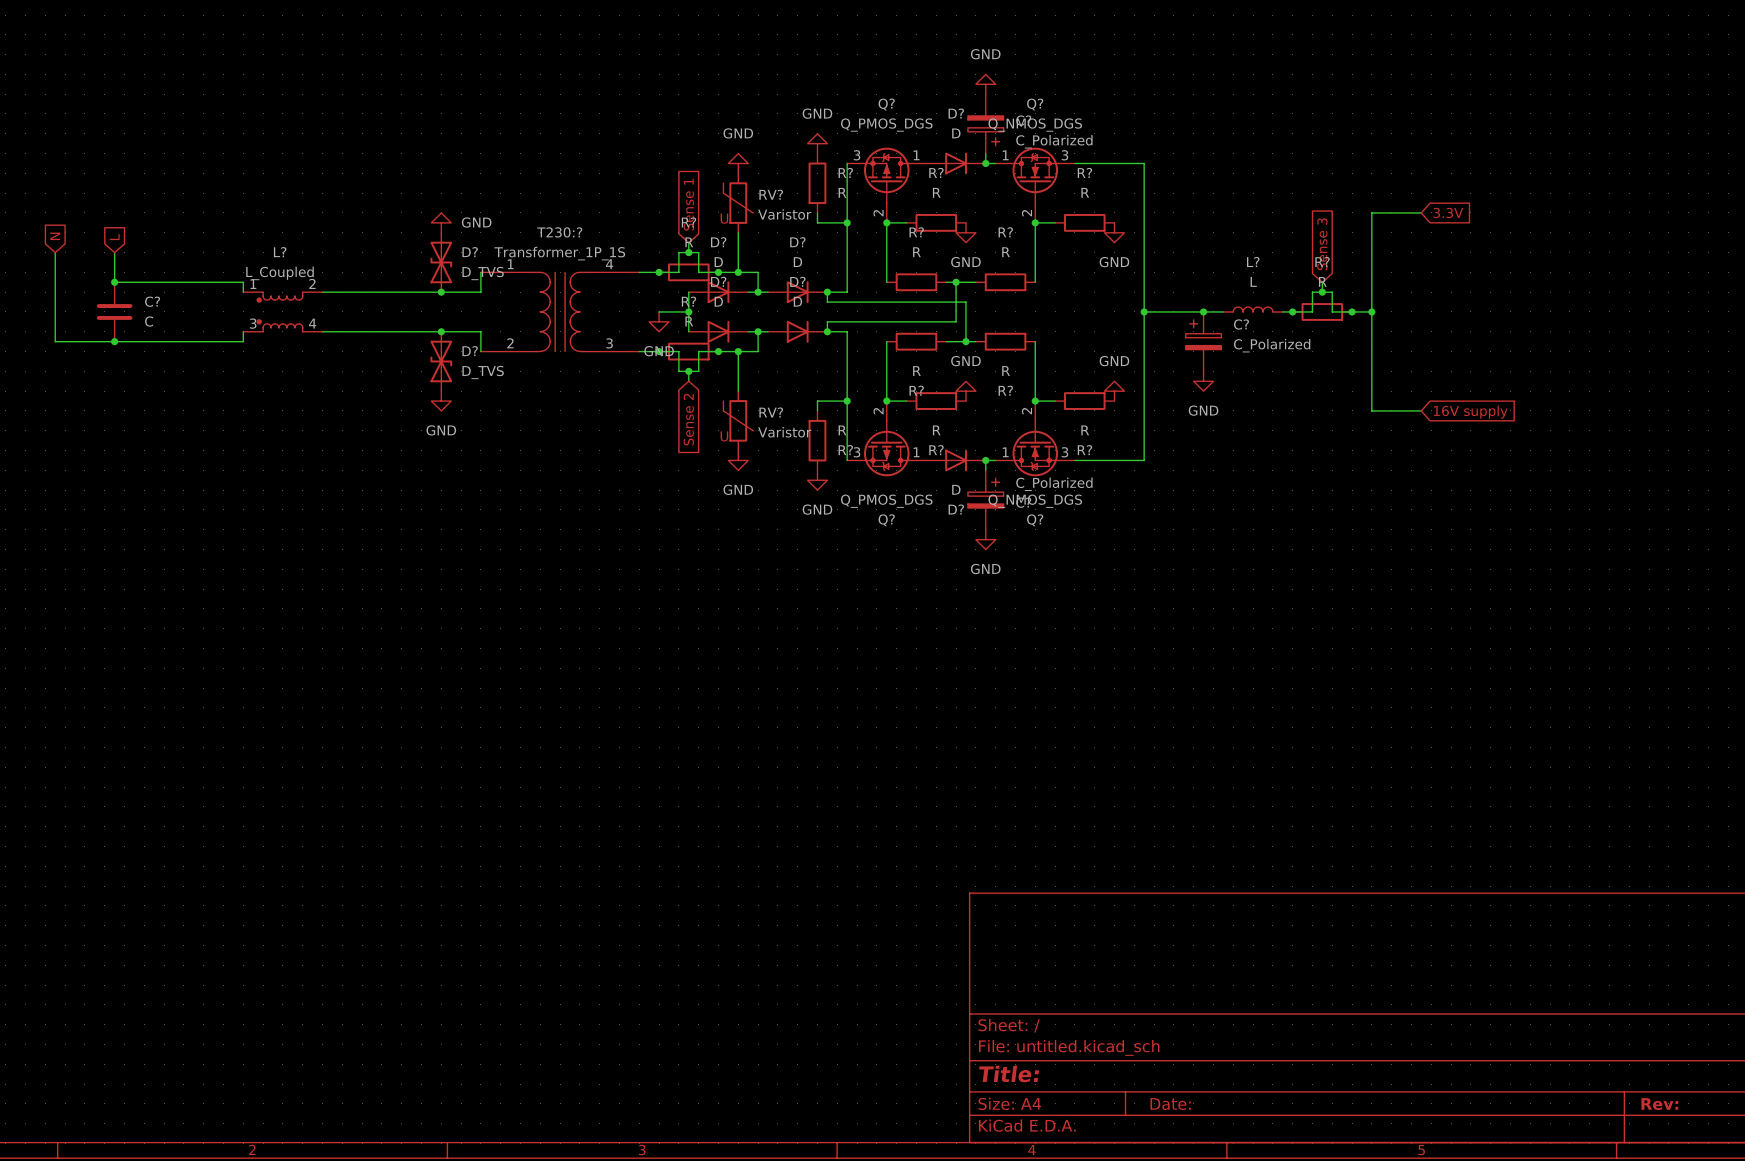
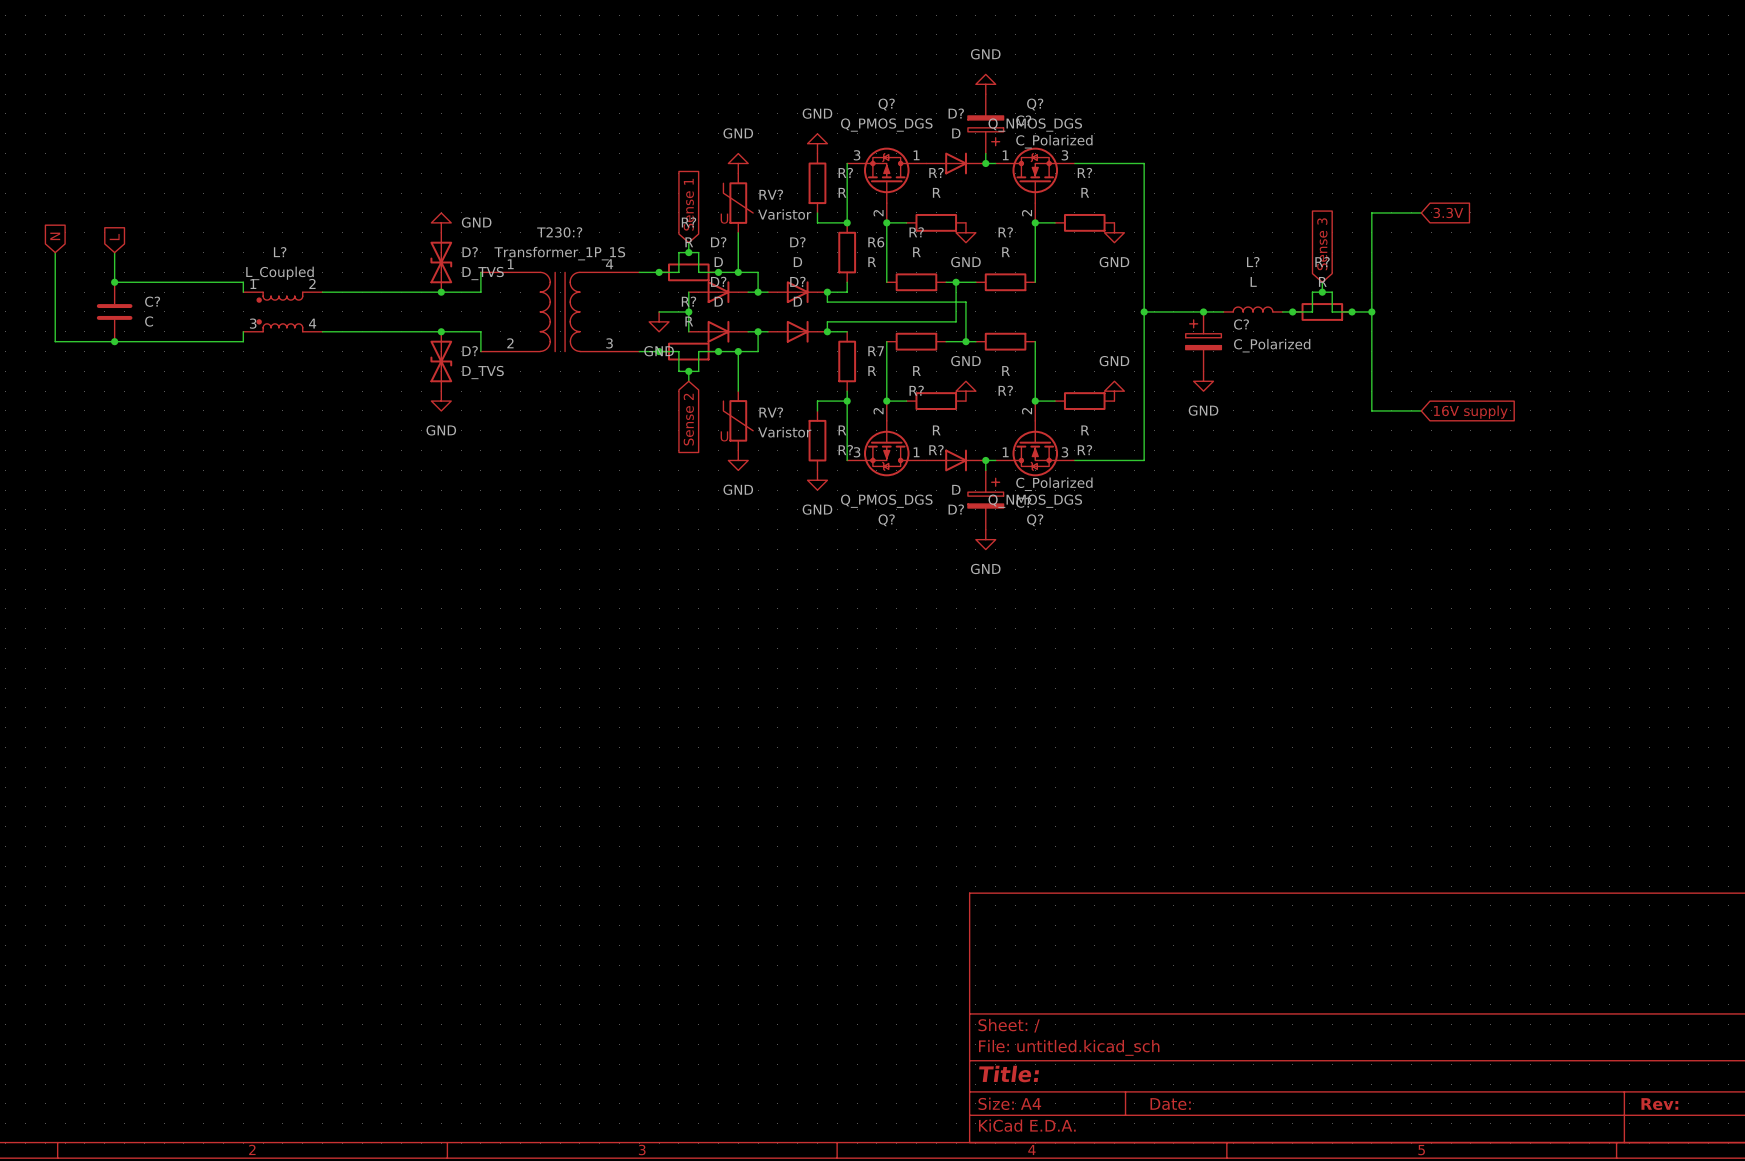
wire: (847, 222) (847, 282) -> none
R6: none -> R (847, 252)
wire: (847, 331) (847, 391) -> none
R7: none -> R (847, 361)

